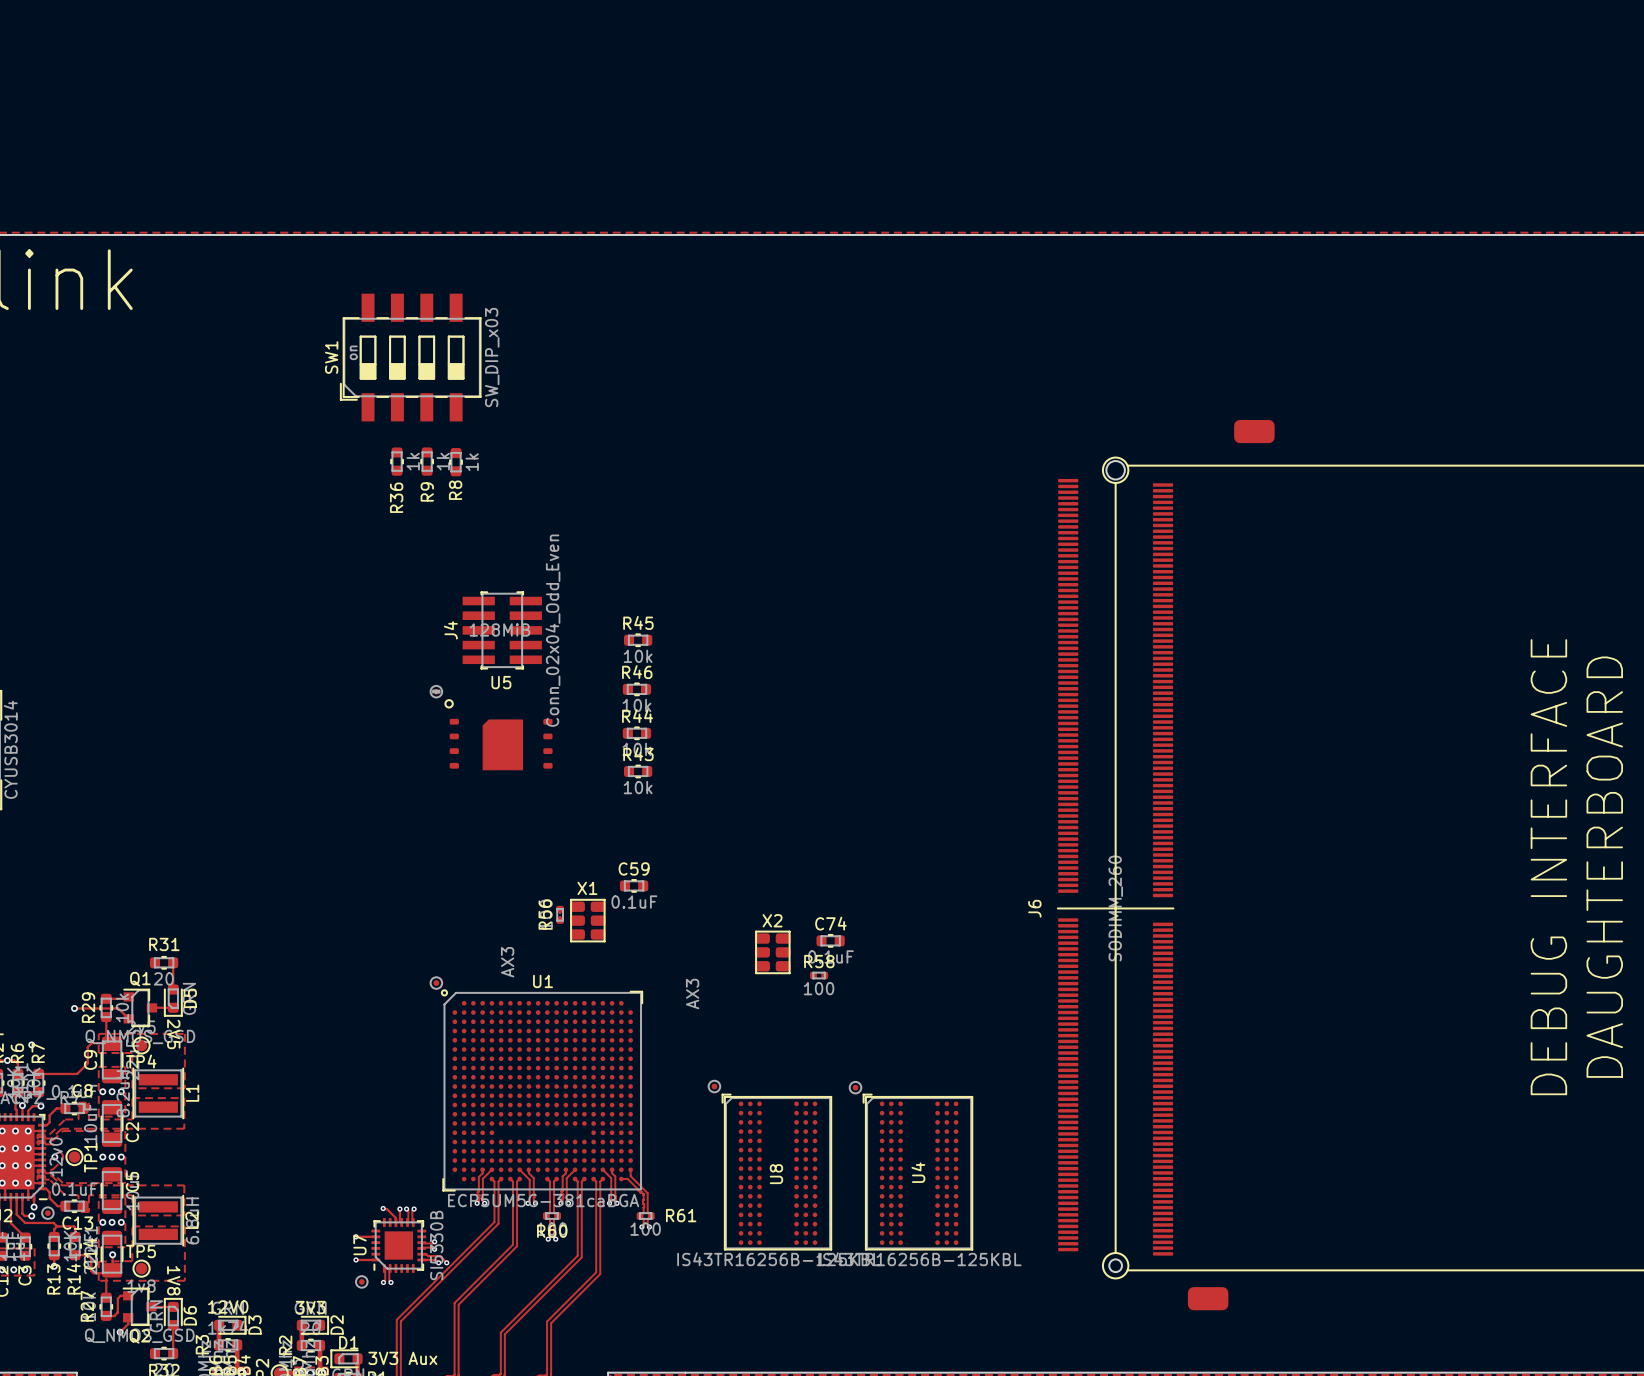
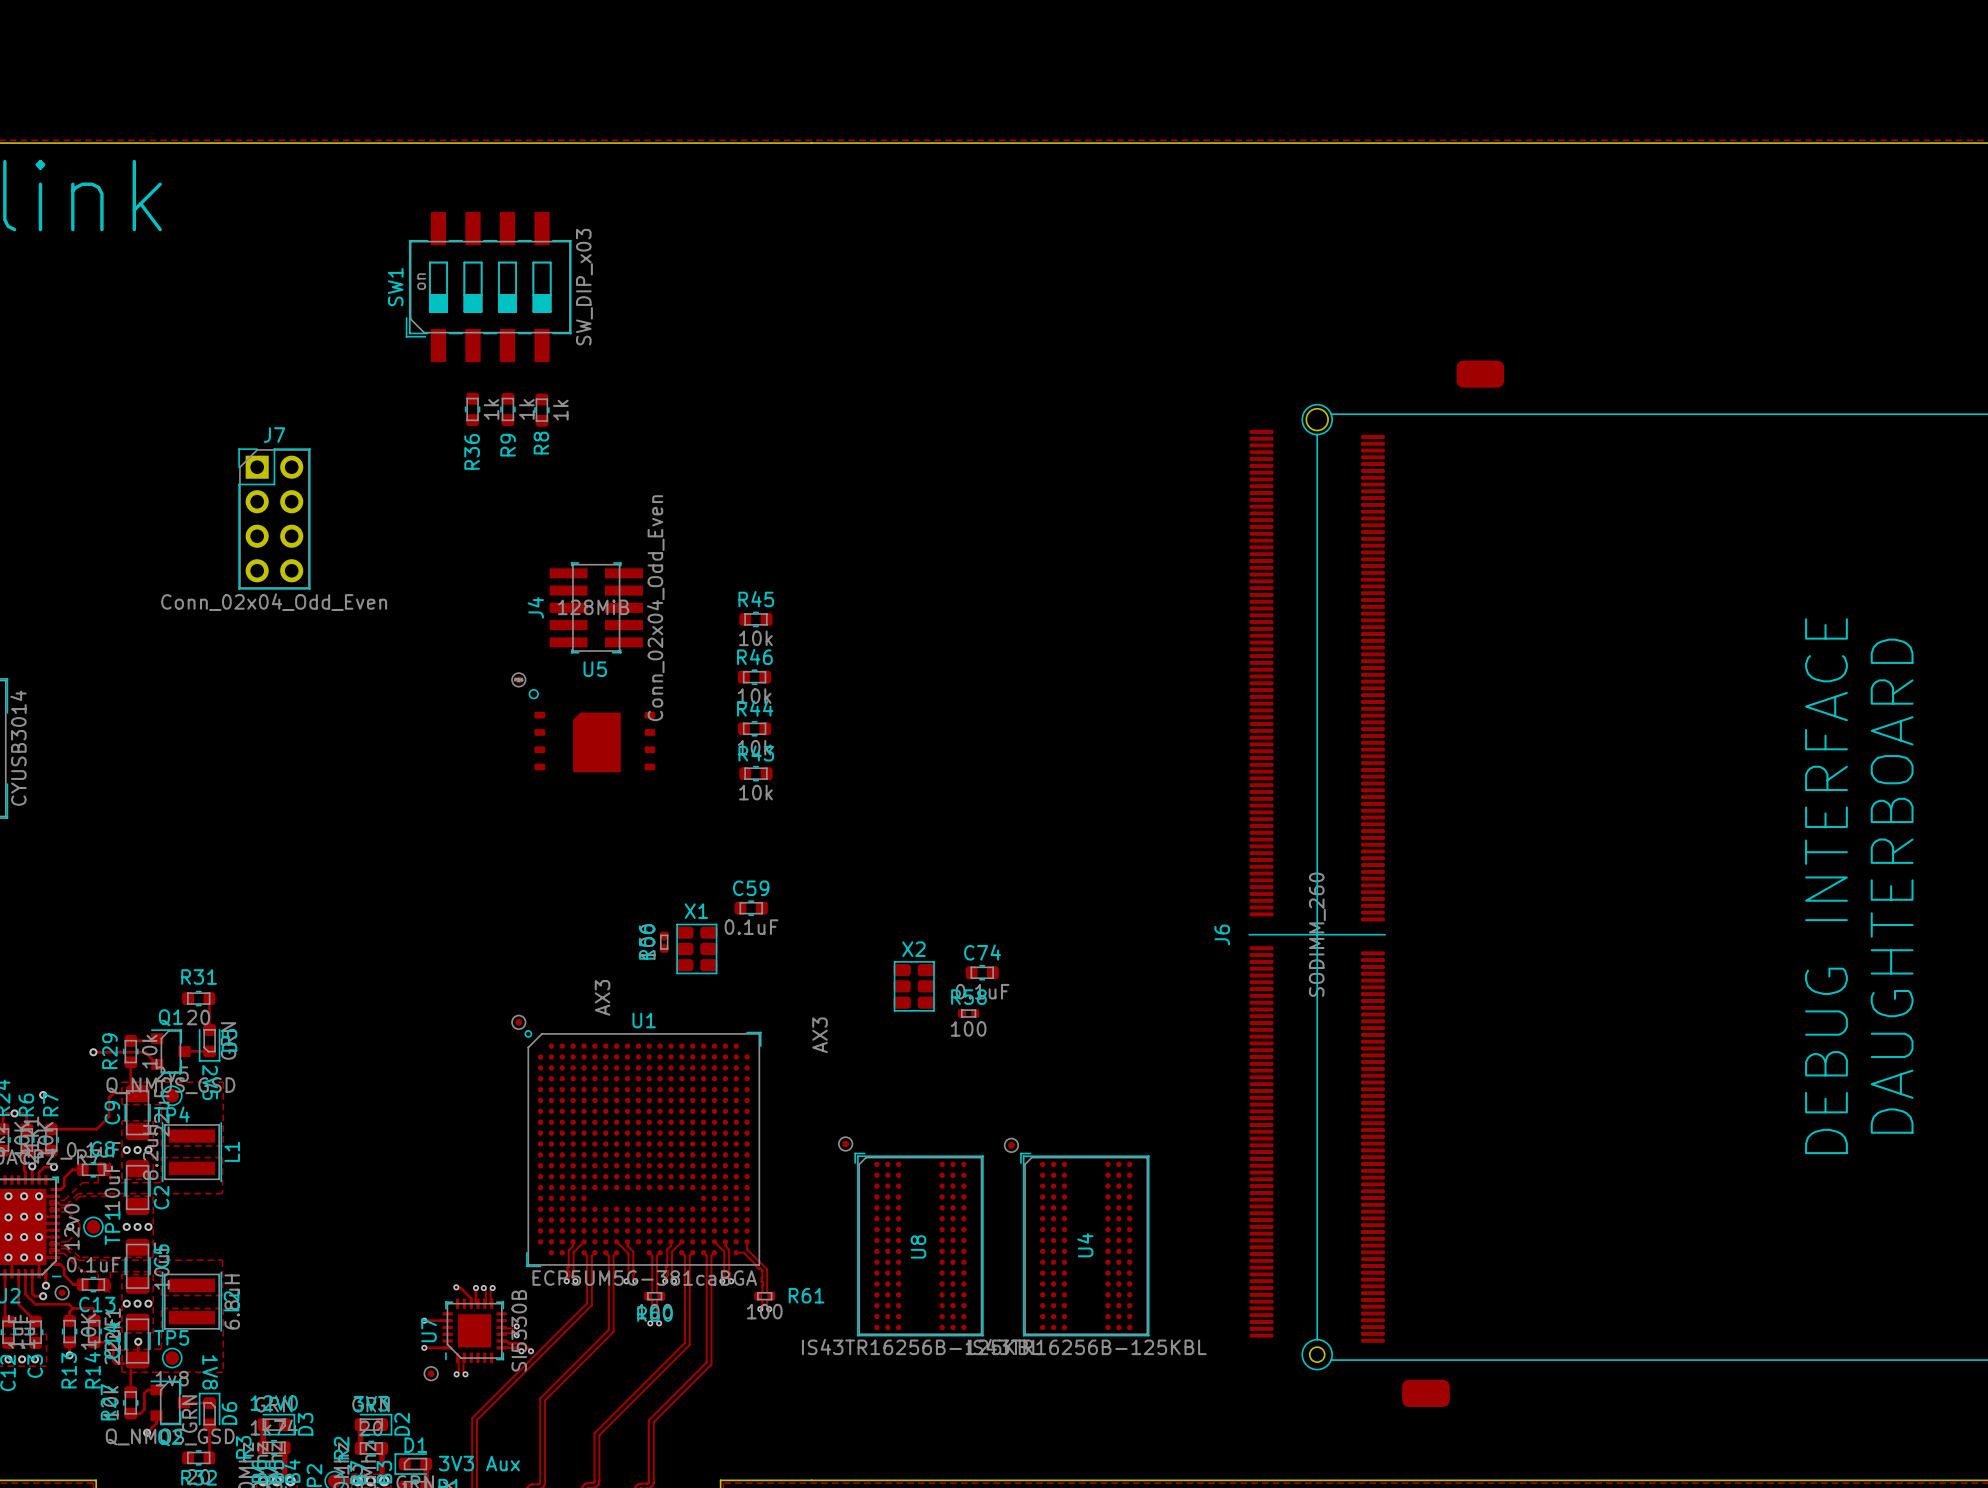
J7: none -> Conn_02x04_Odd_Even (274, 518)

